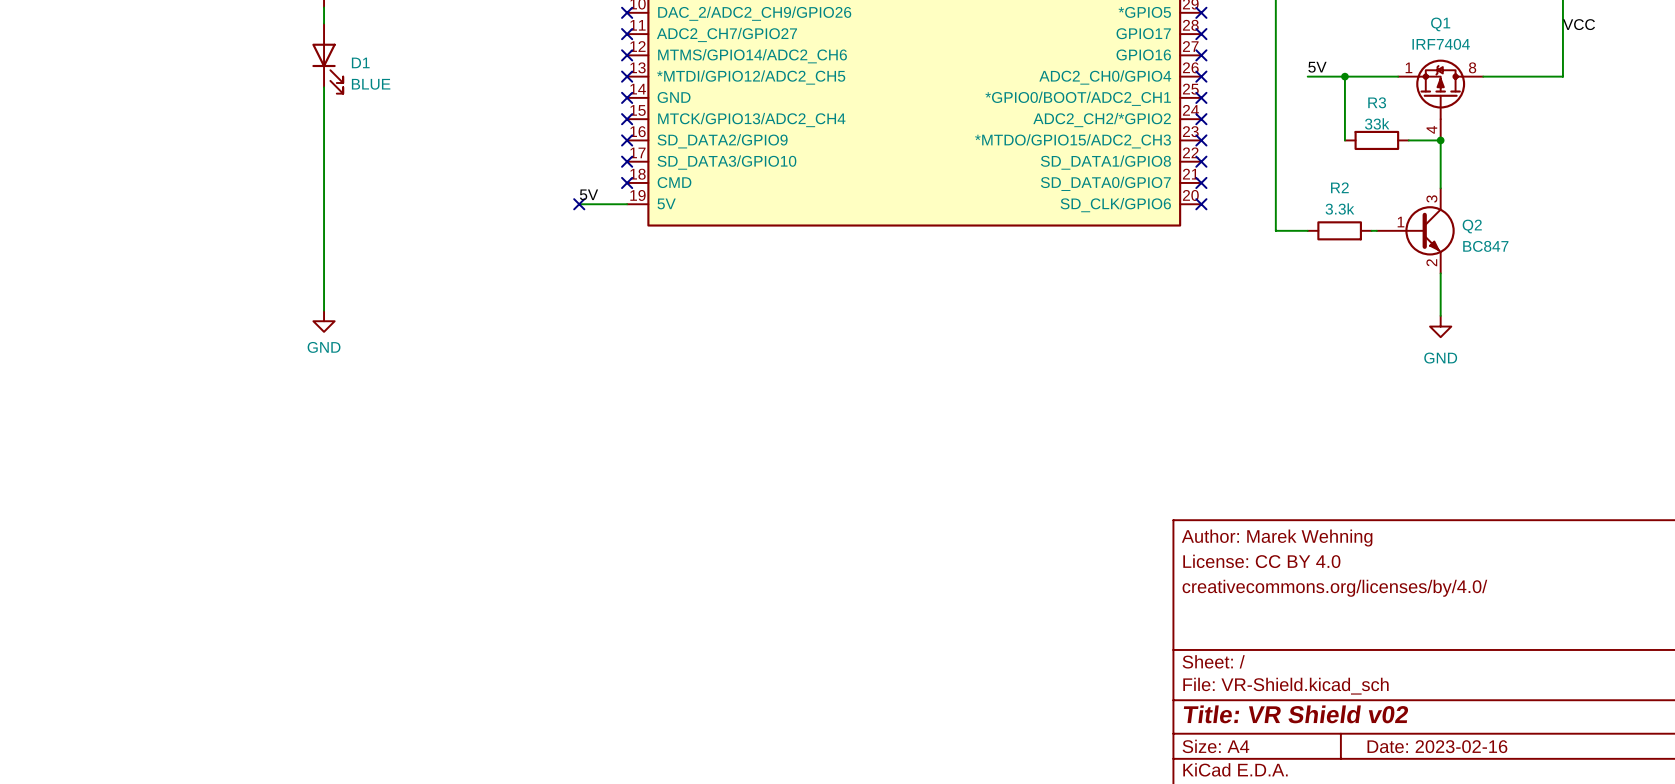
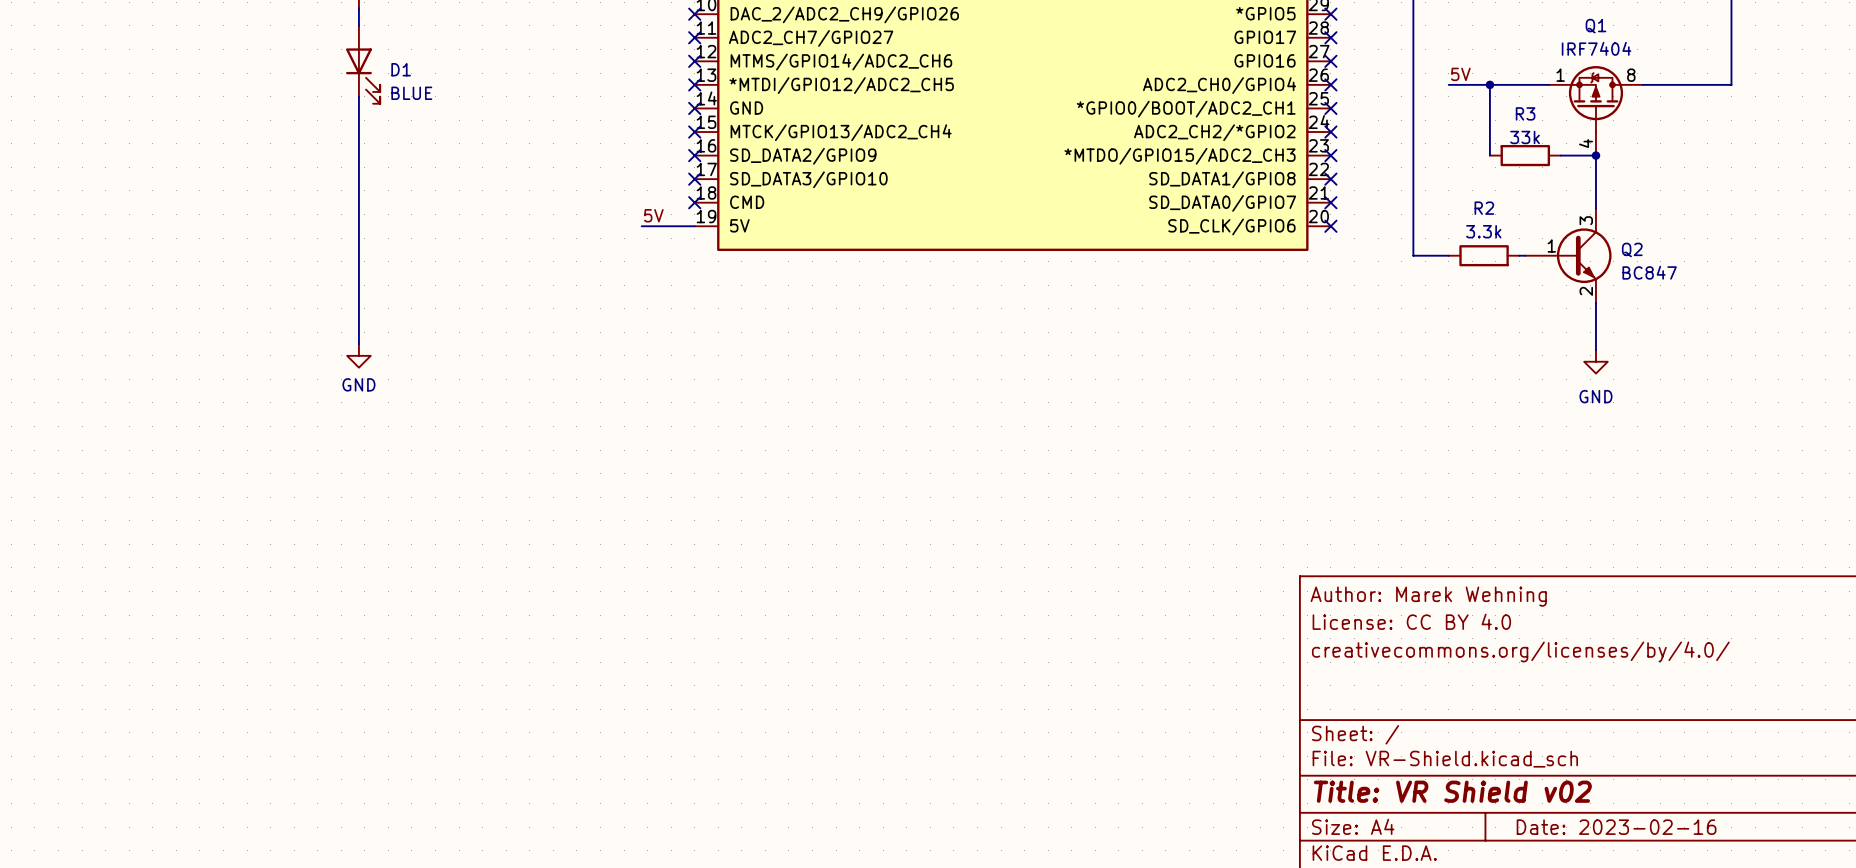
label: VCC (1579, 24) -> none
no-connect mark: (579, 204) -> none

